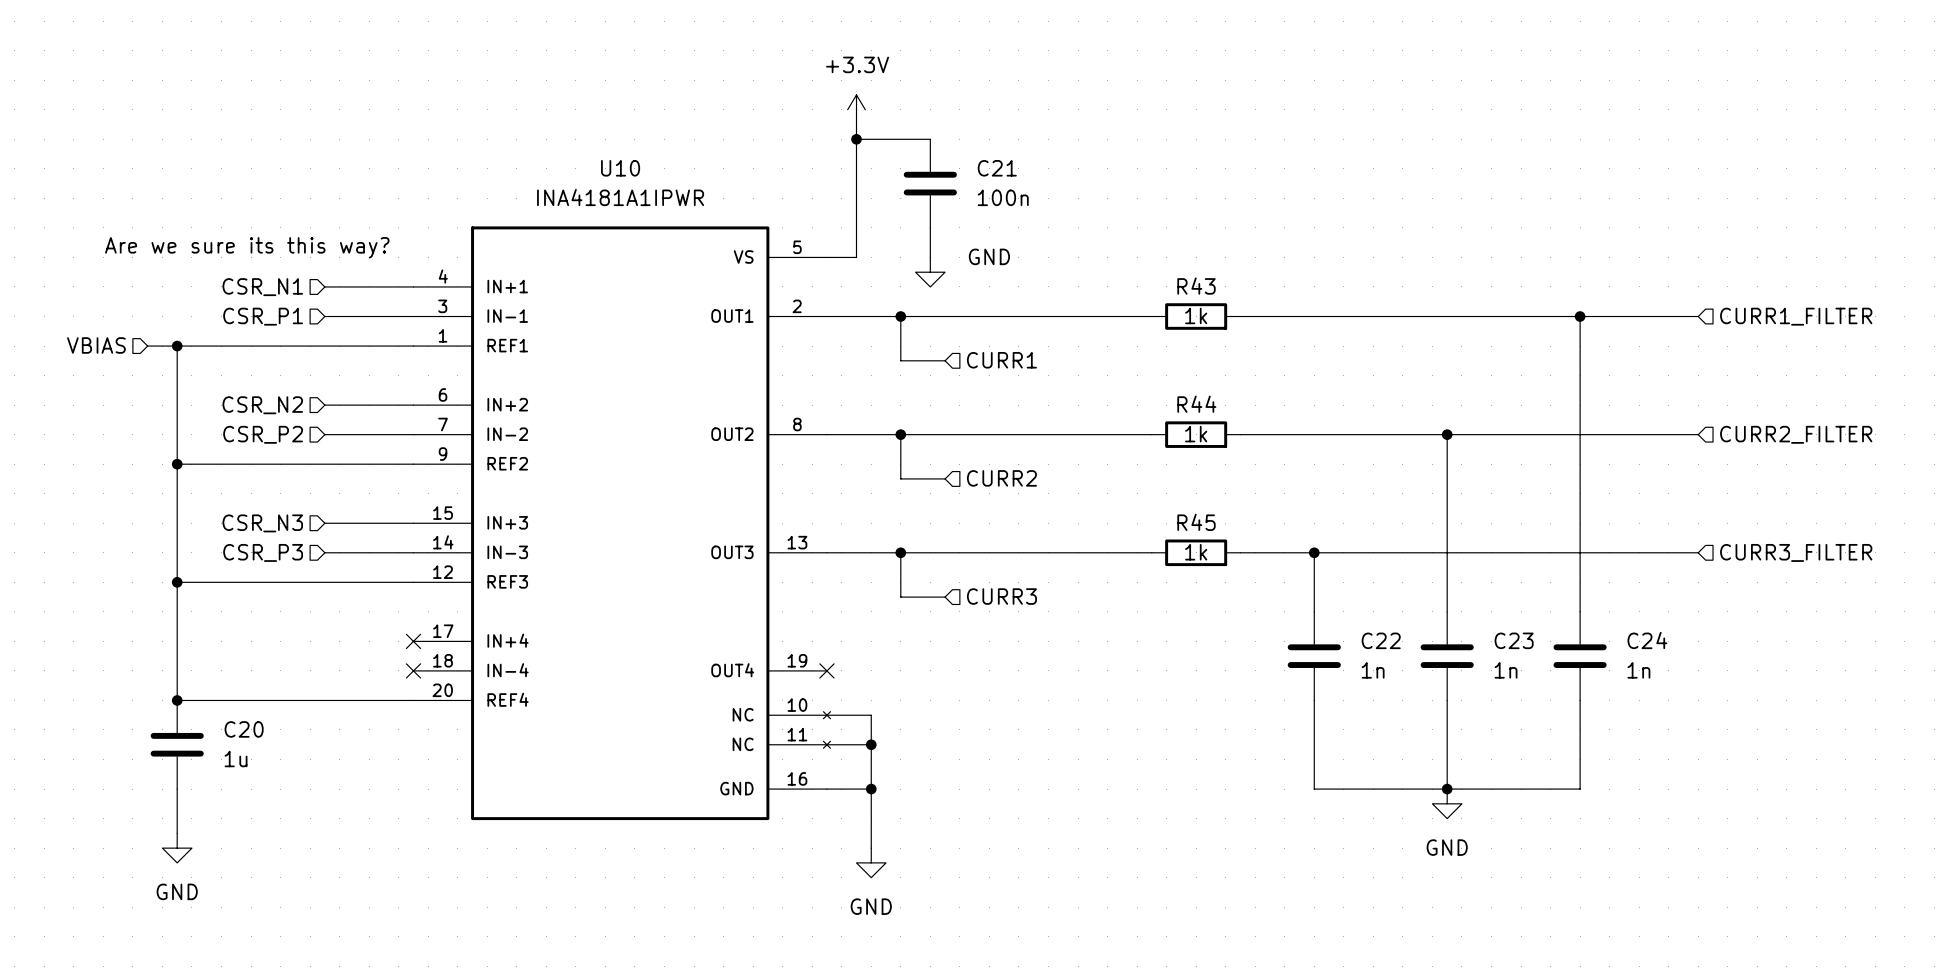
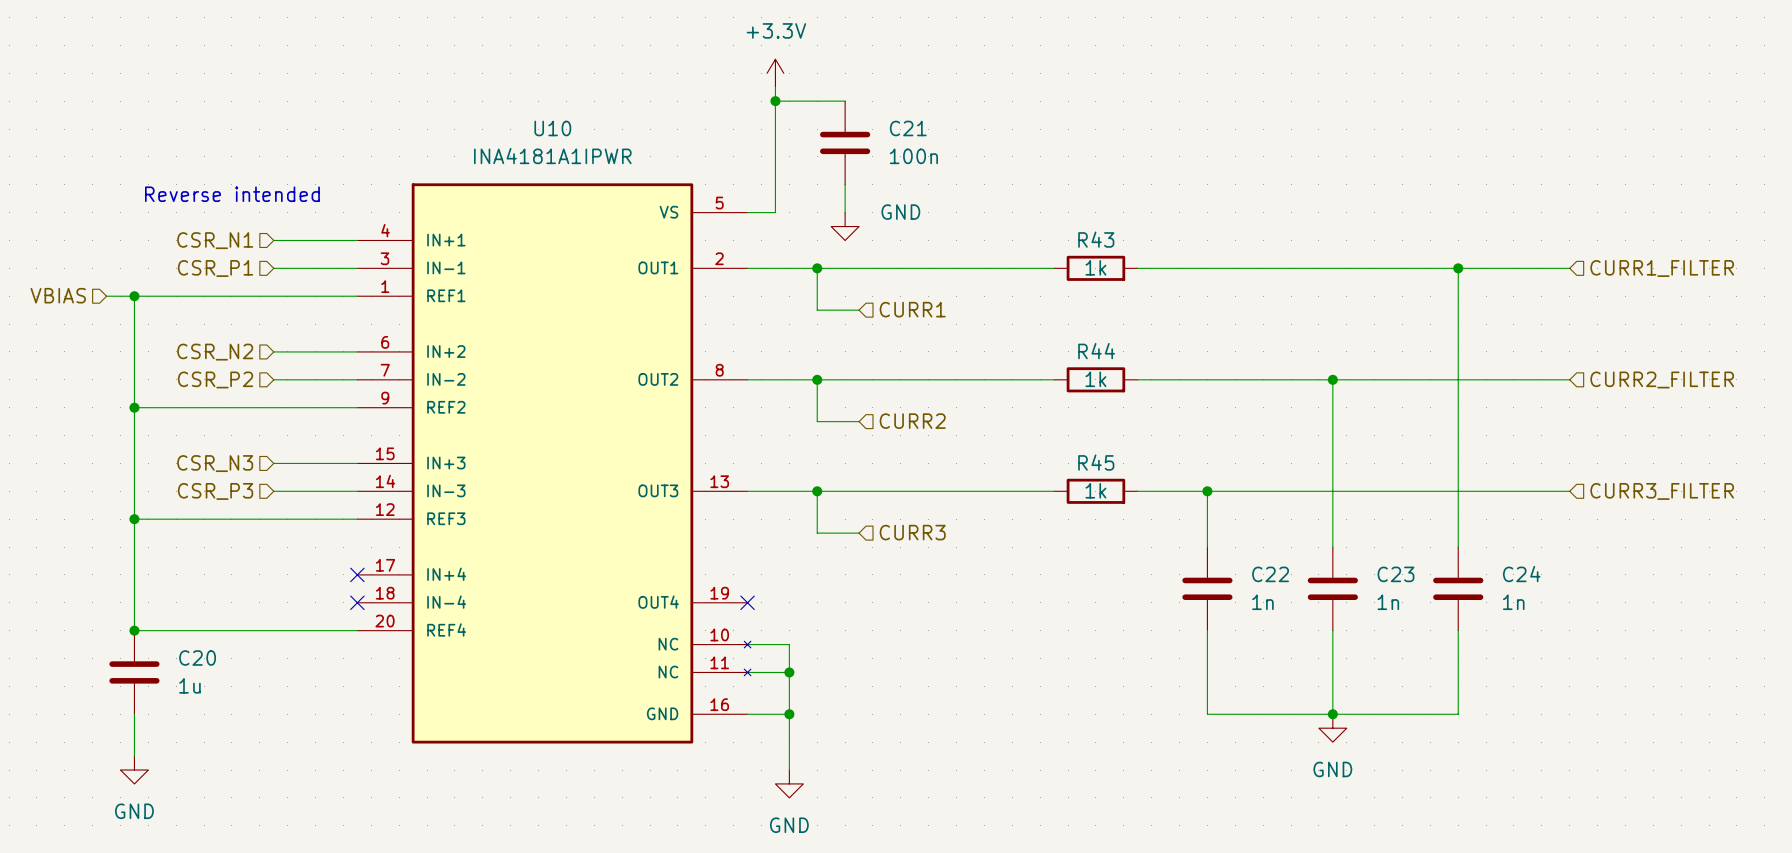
text: none -> Reverse intended (232, 194)
text: Are we sure its this way? (247, 247) -> none

